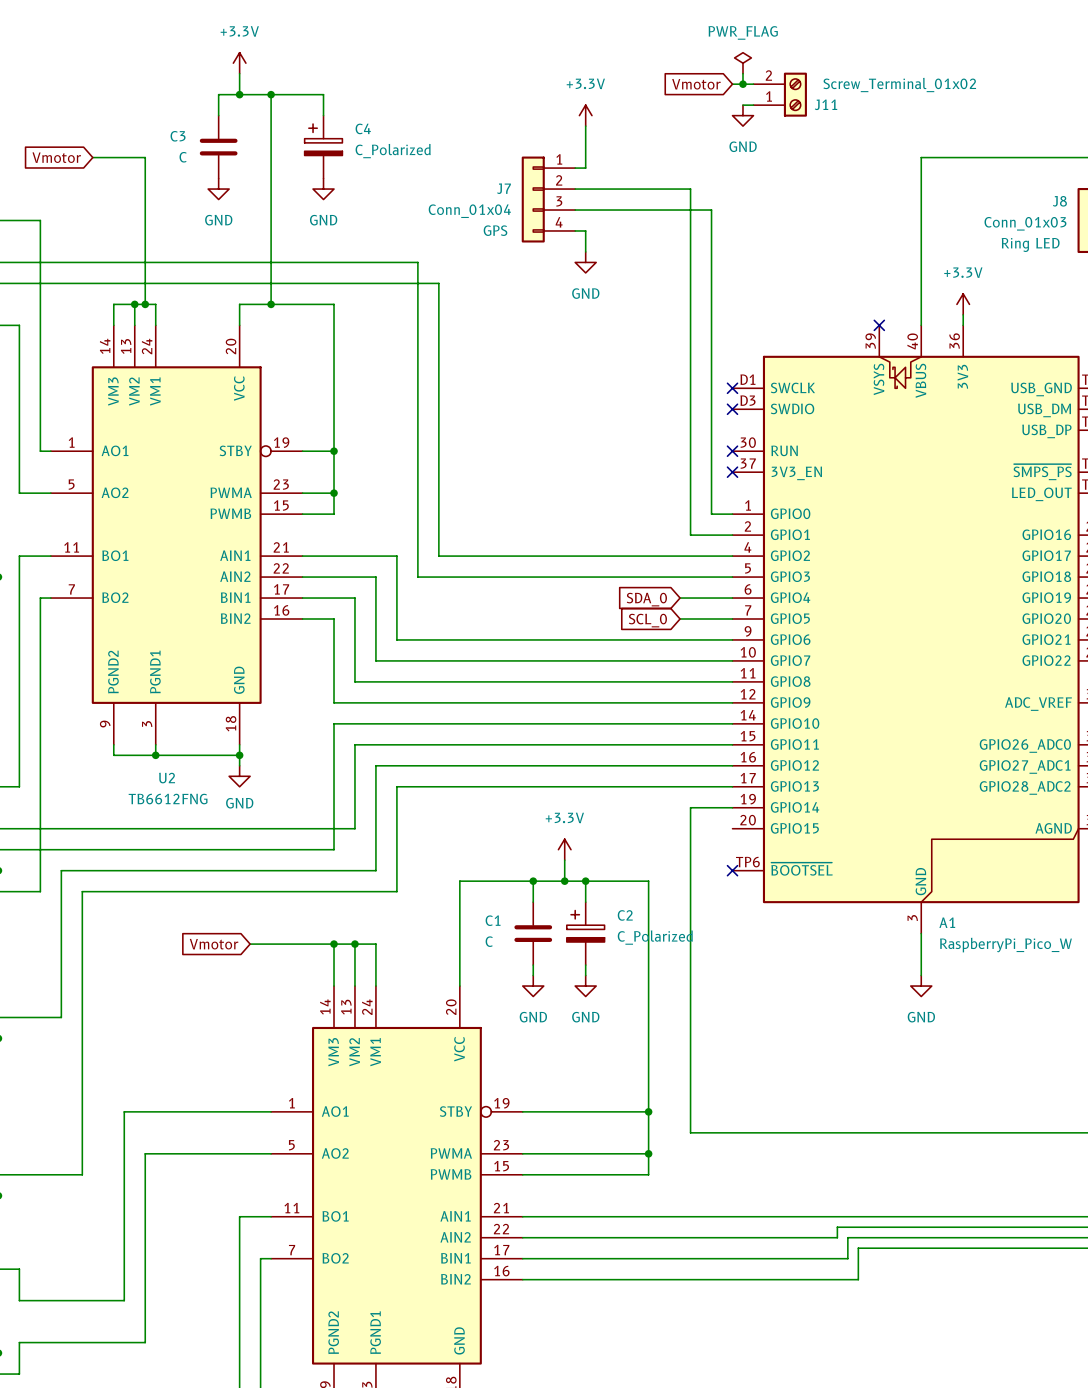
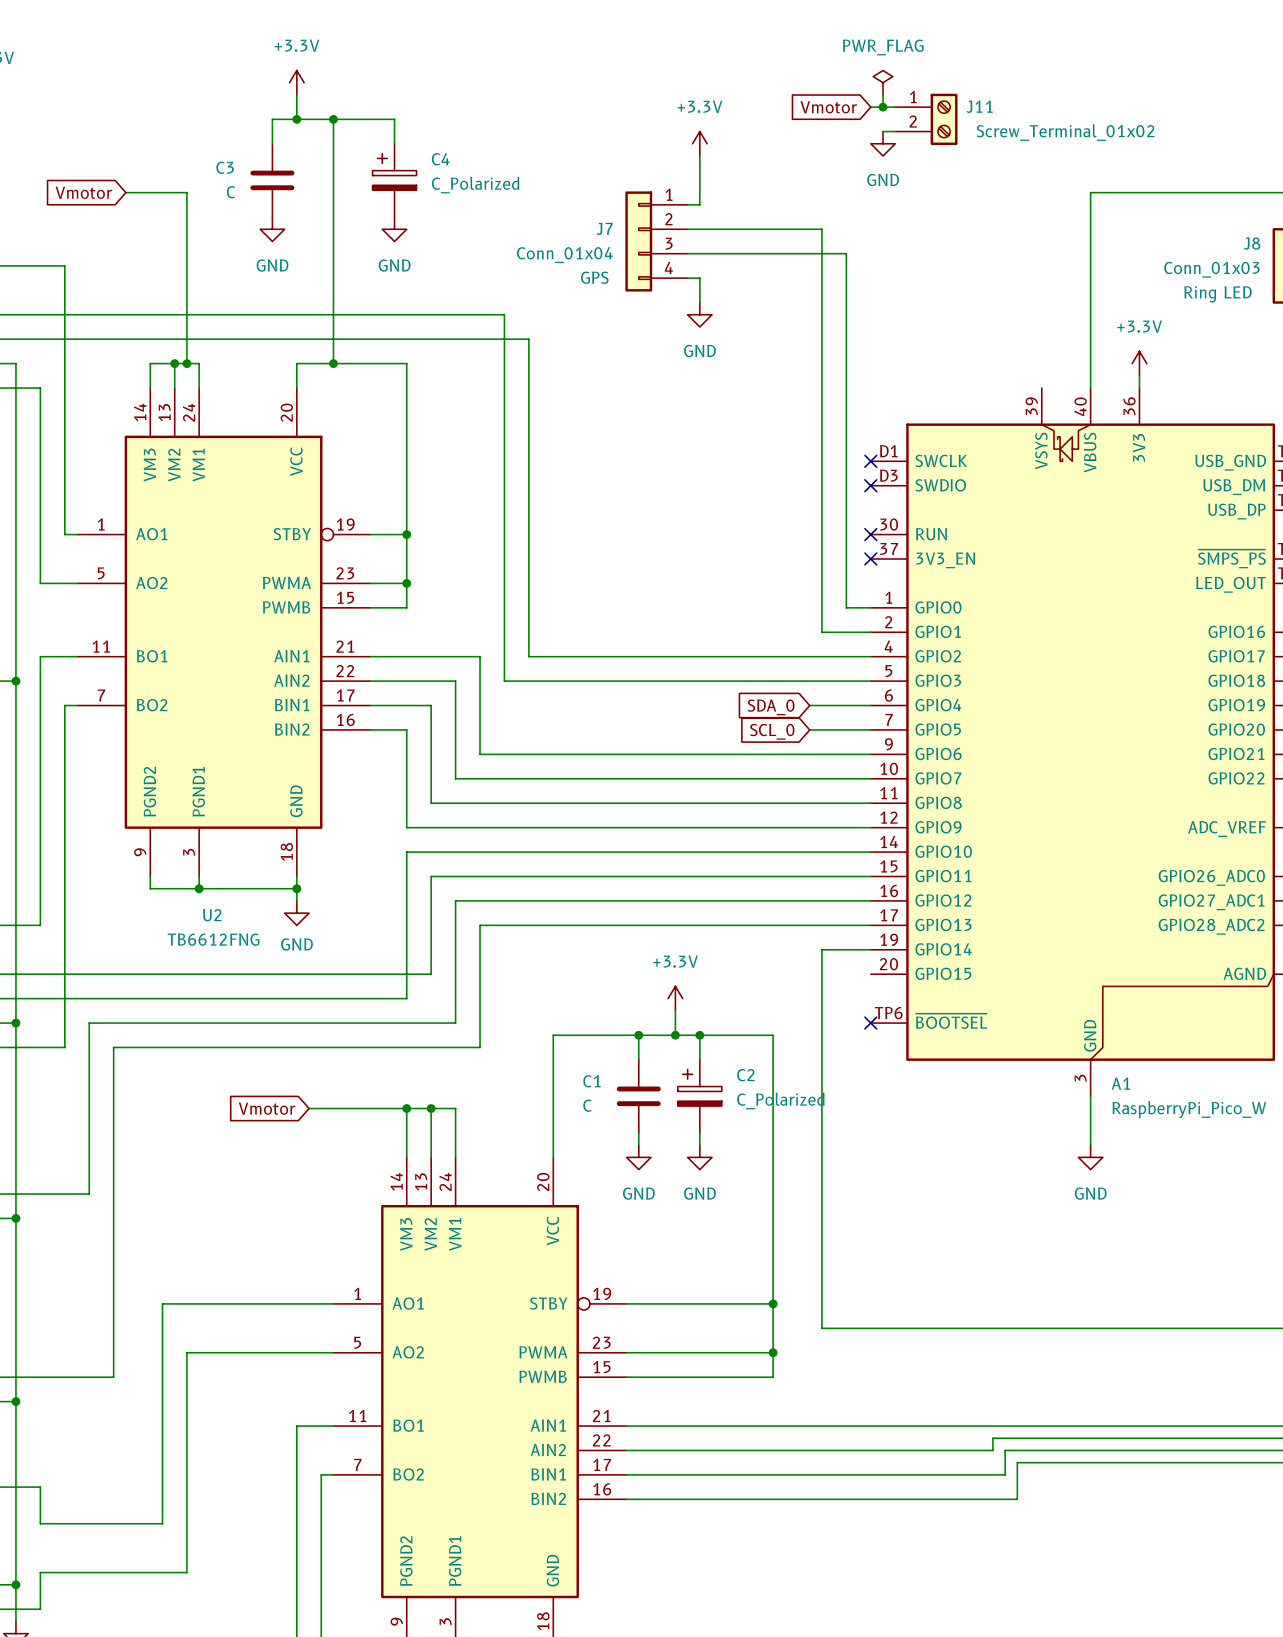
J11 flip: as is (795, 94) -> up-down (944, 119)
no-connect mark: (879, 325) -> none

